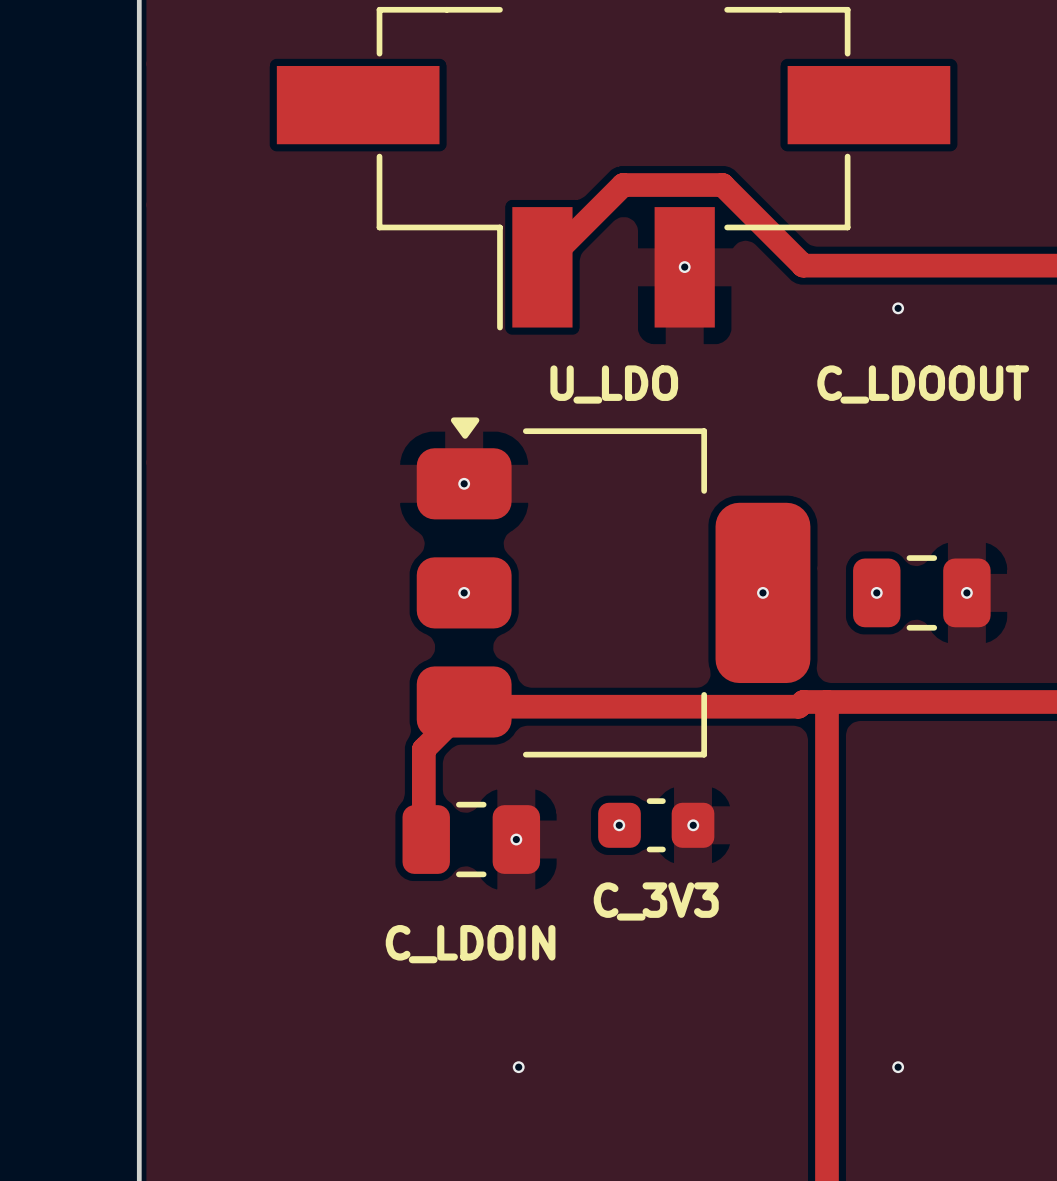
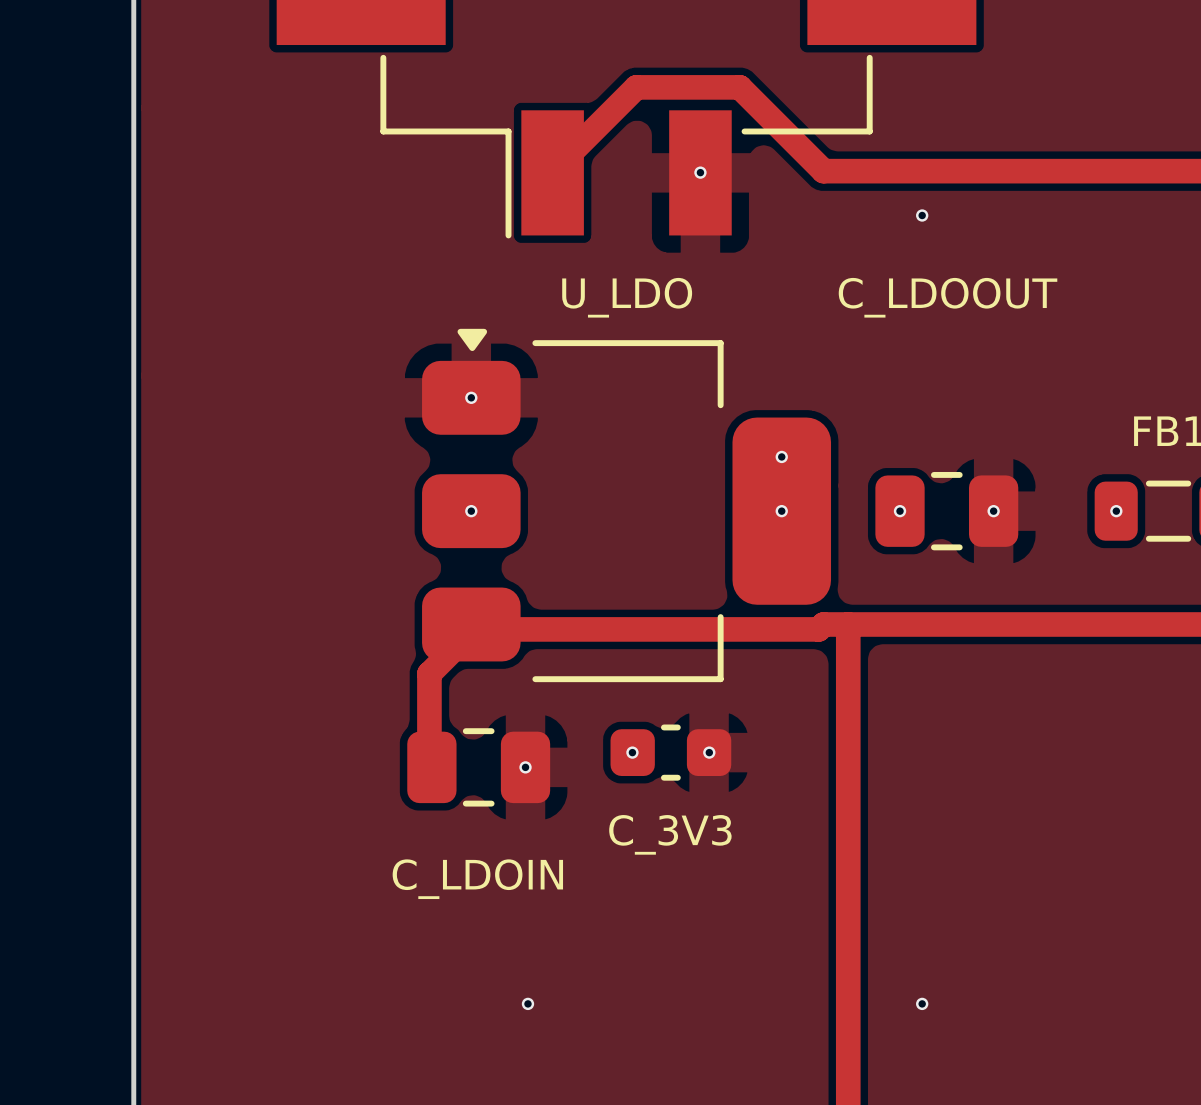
via: none -> (781, 456)

